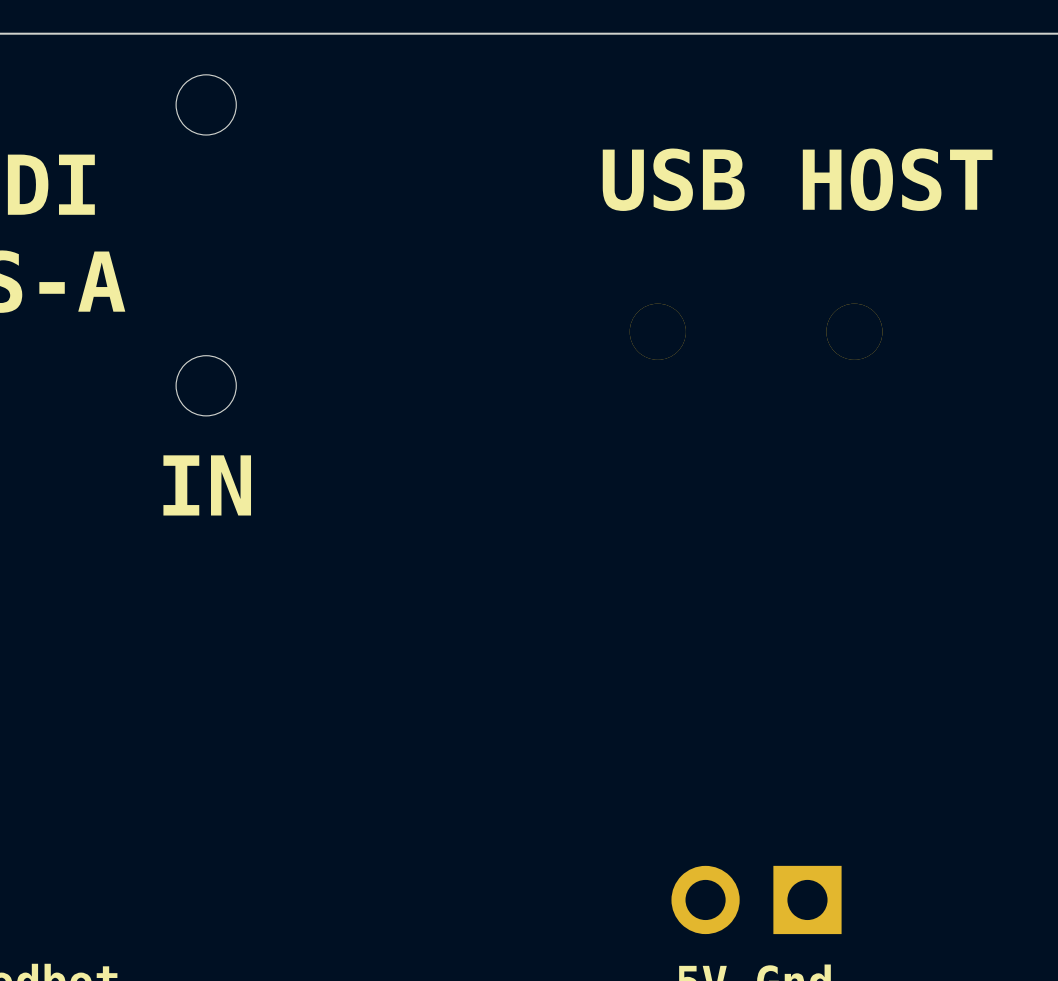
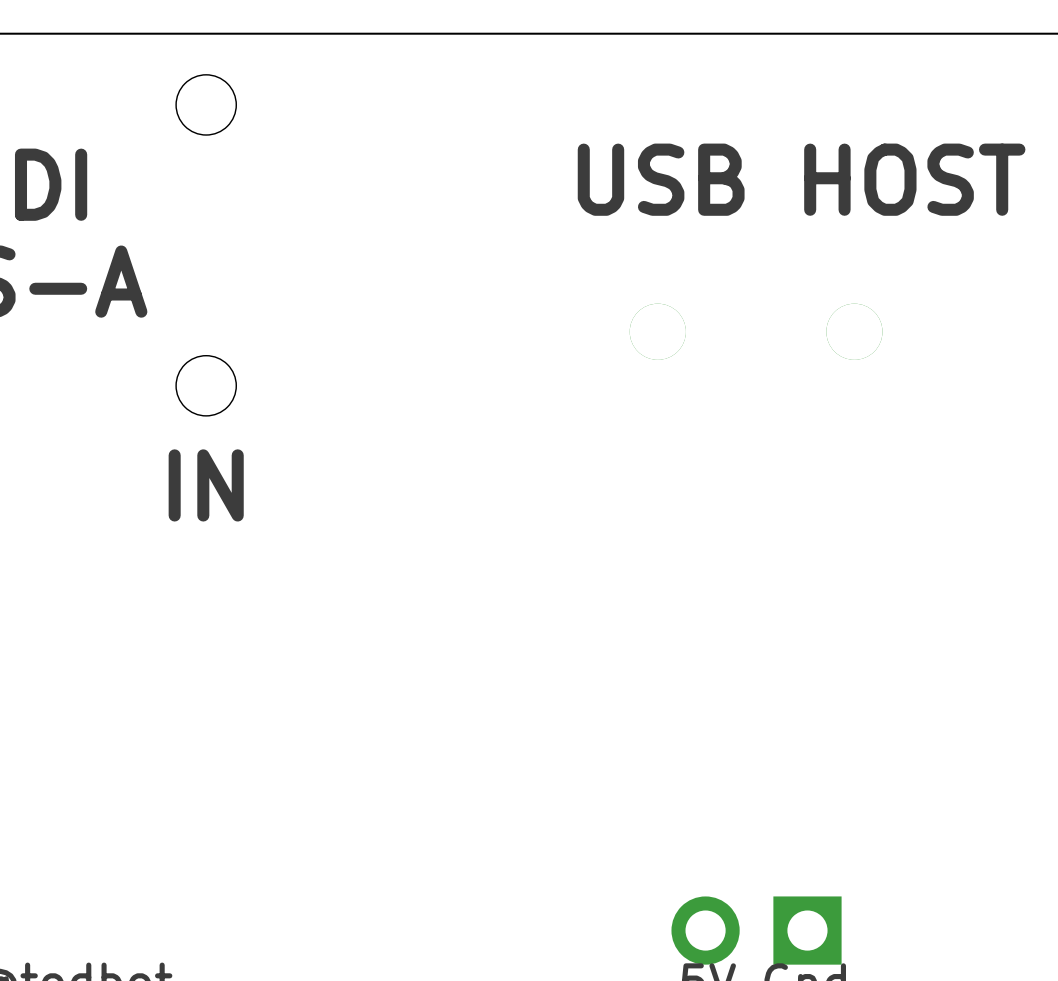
part position: (756, 899) -> (756, 930)

